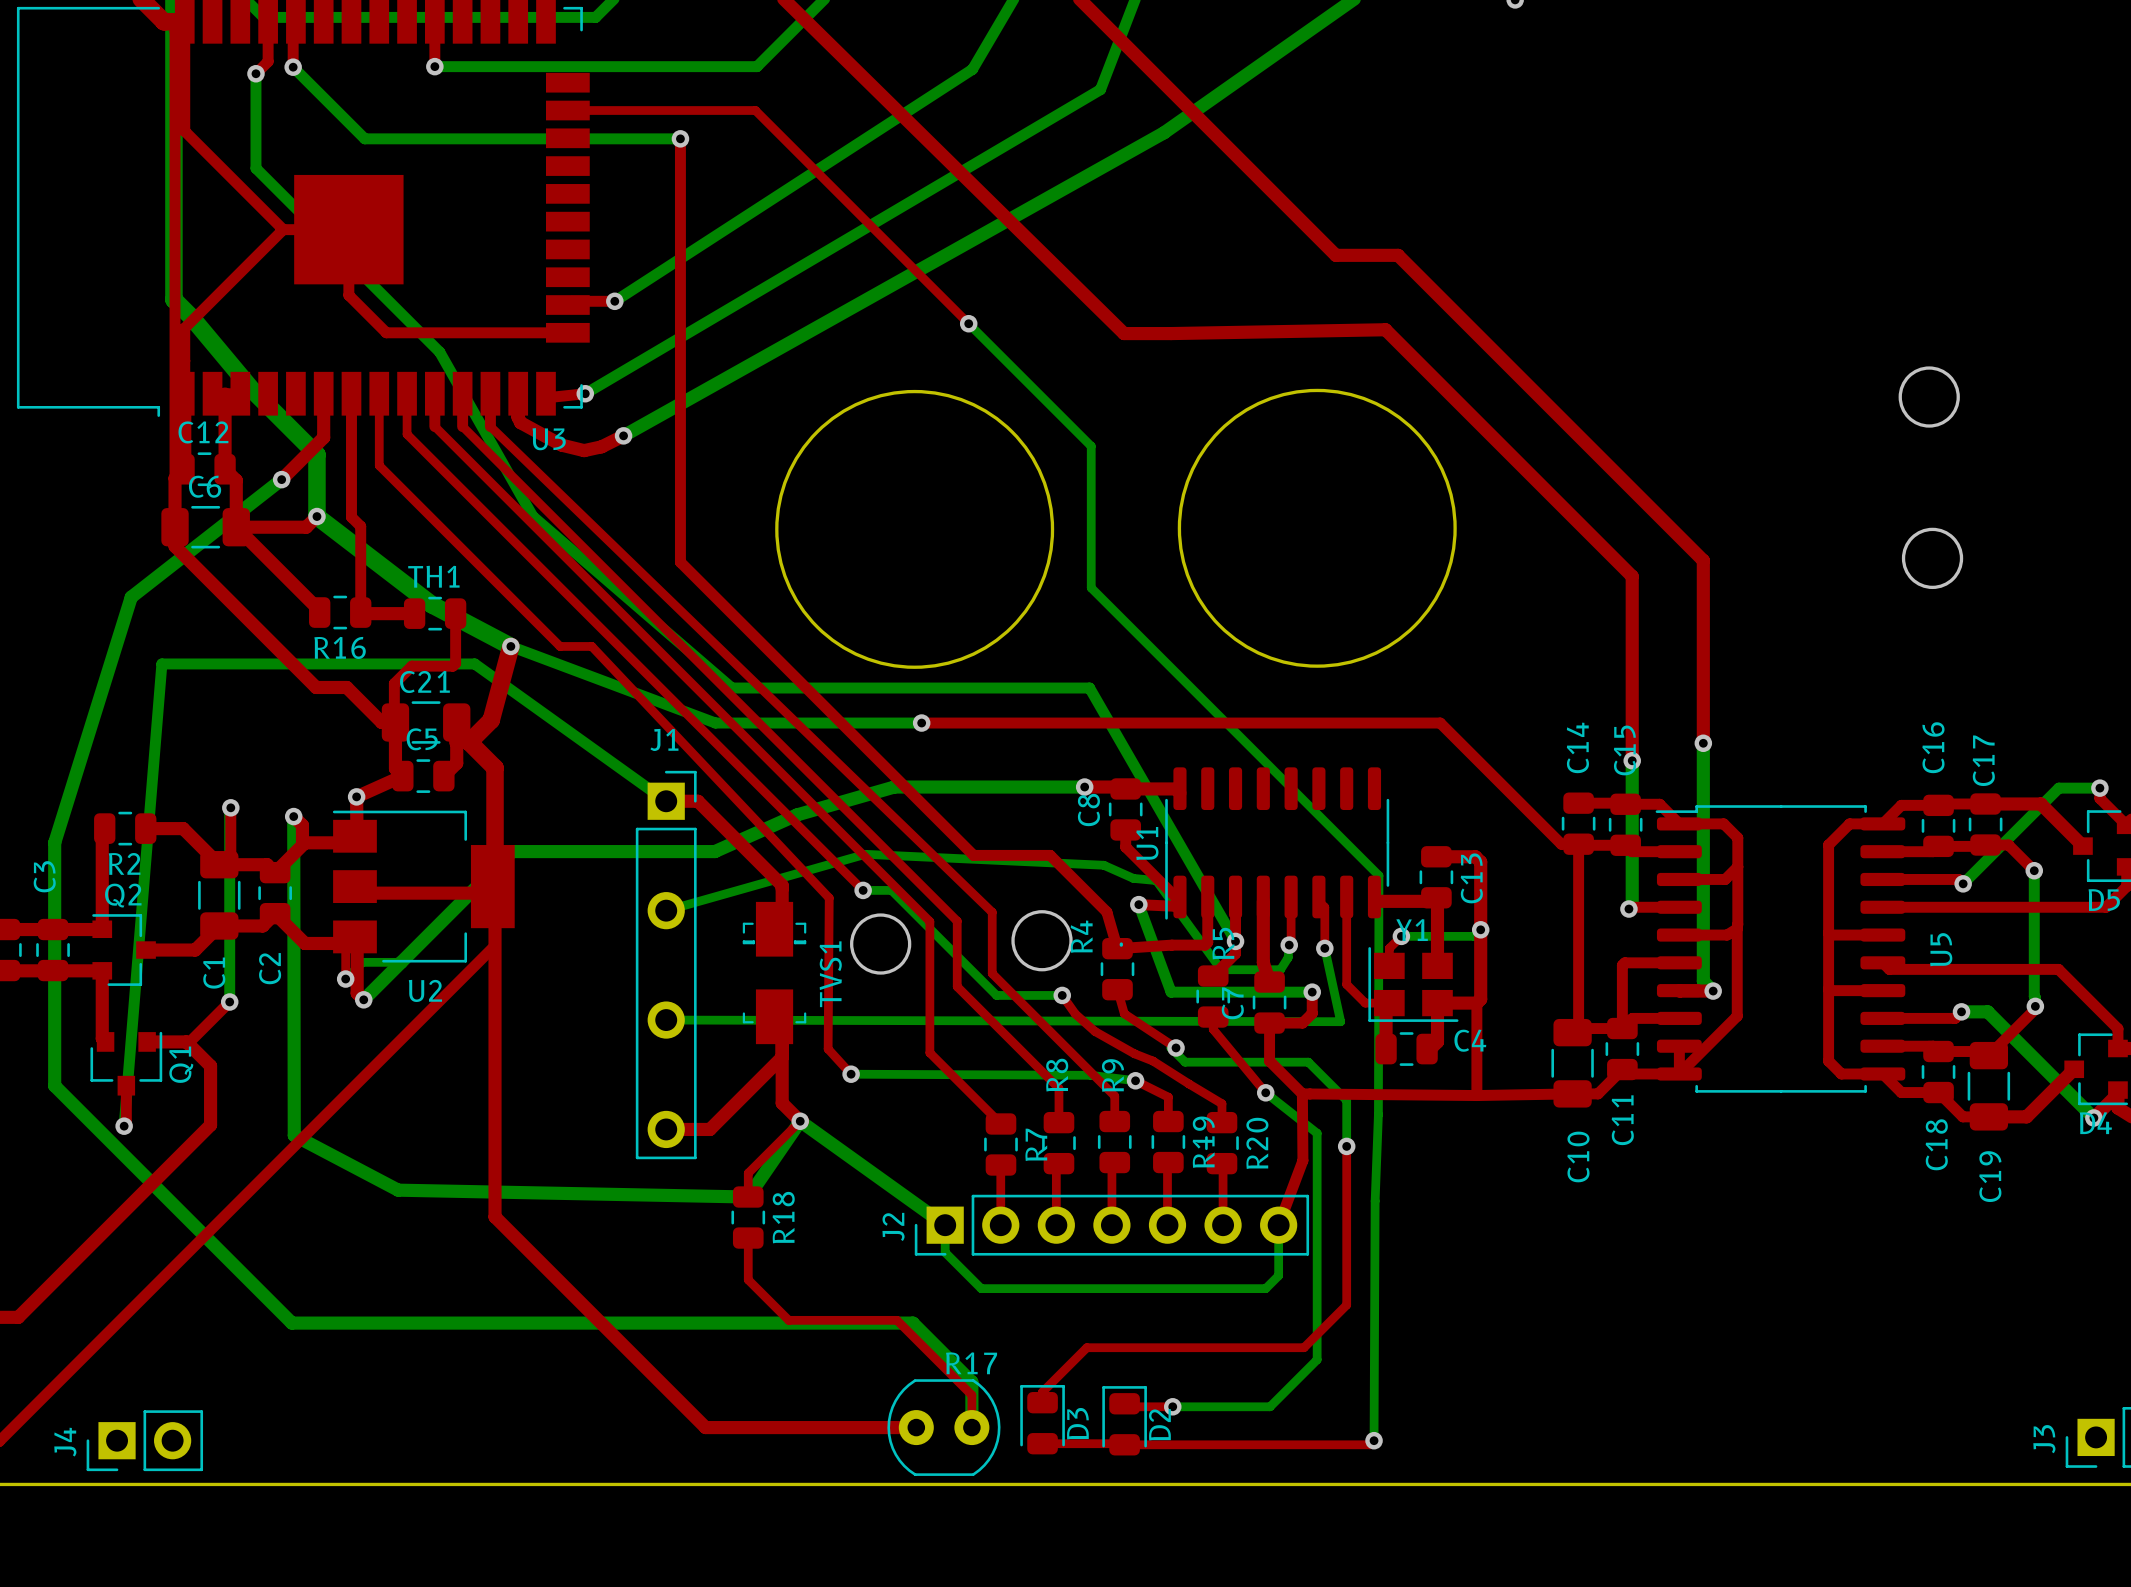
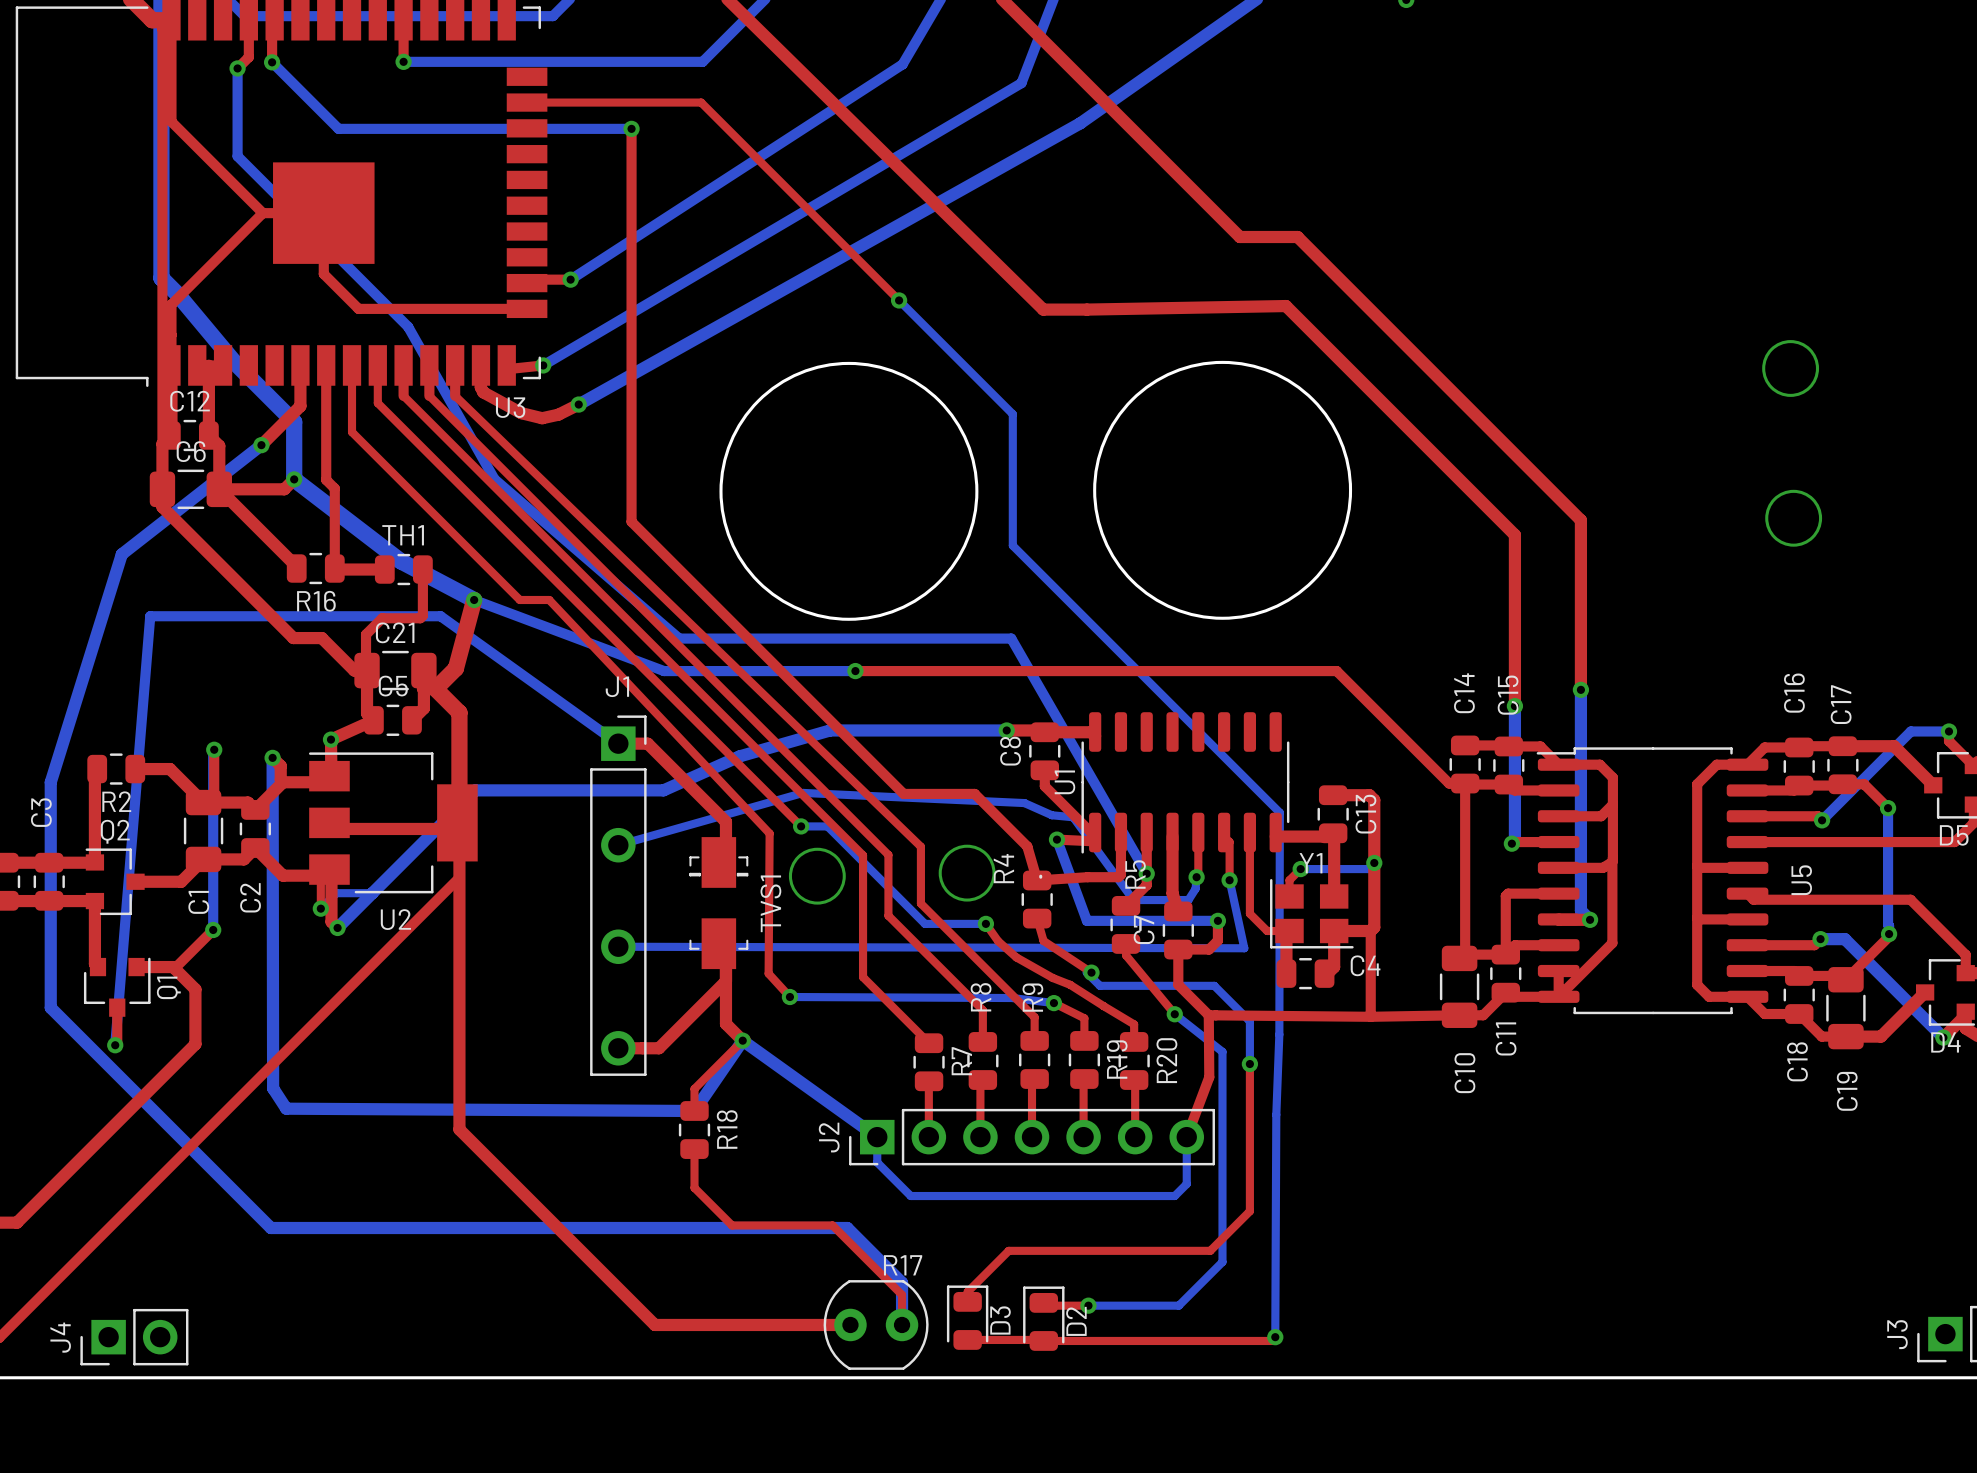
bottom track: (293, 816) (294, 1135) (398, 1190) (748, 1197) -> (272, 757) (273, 1088) (286, 1108) (694, 1110)

